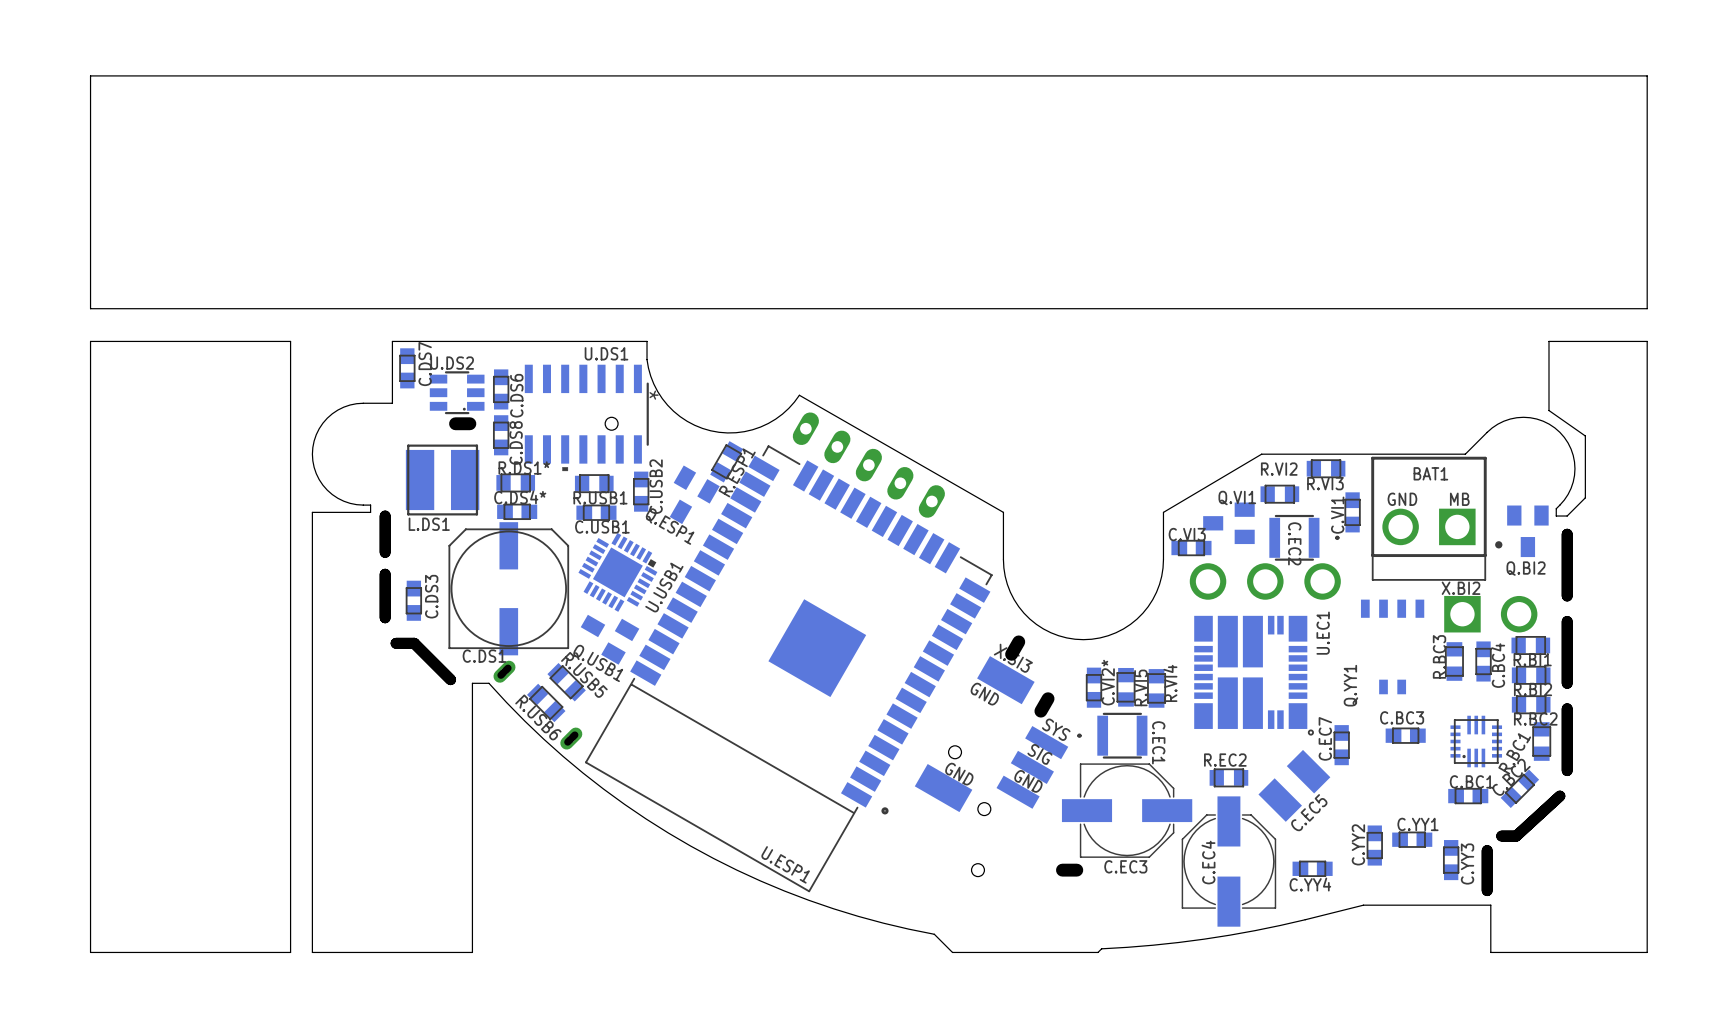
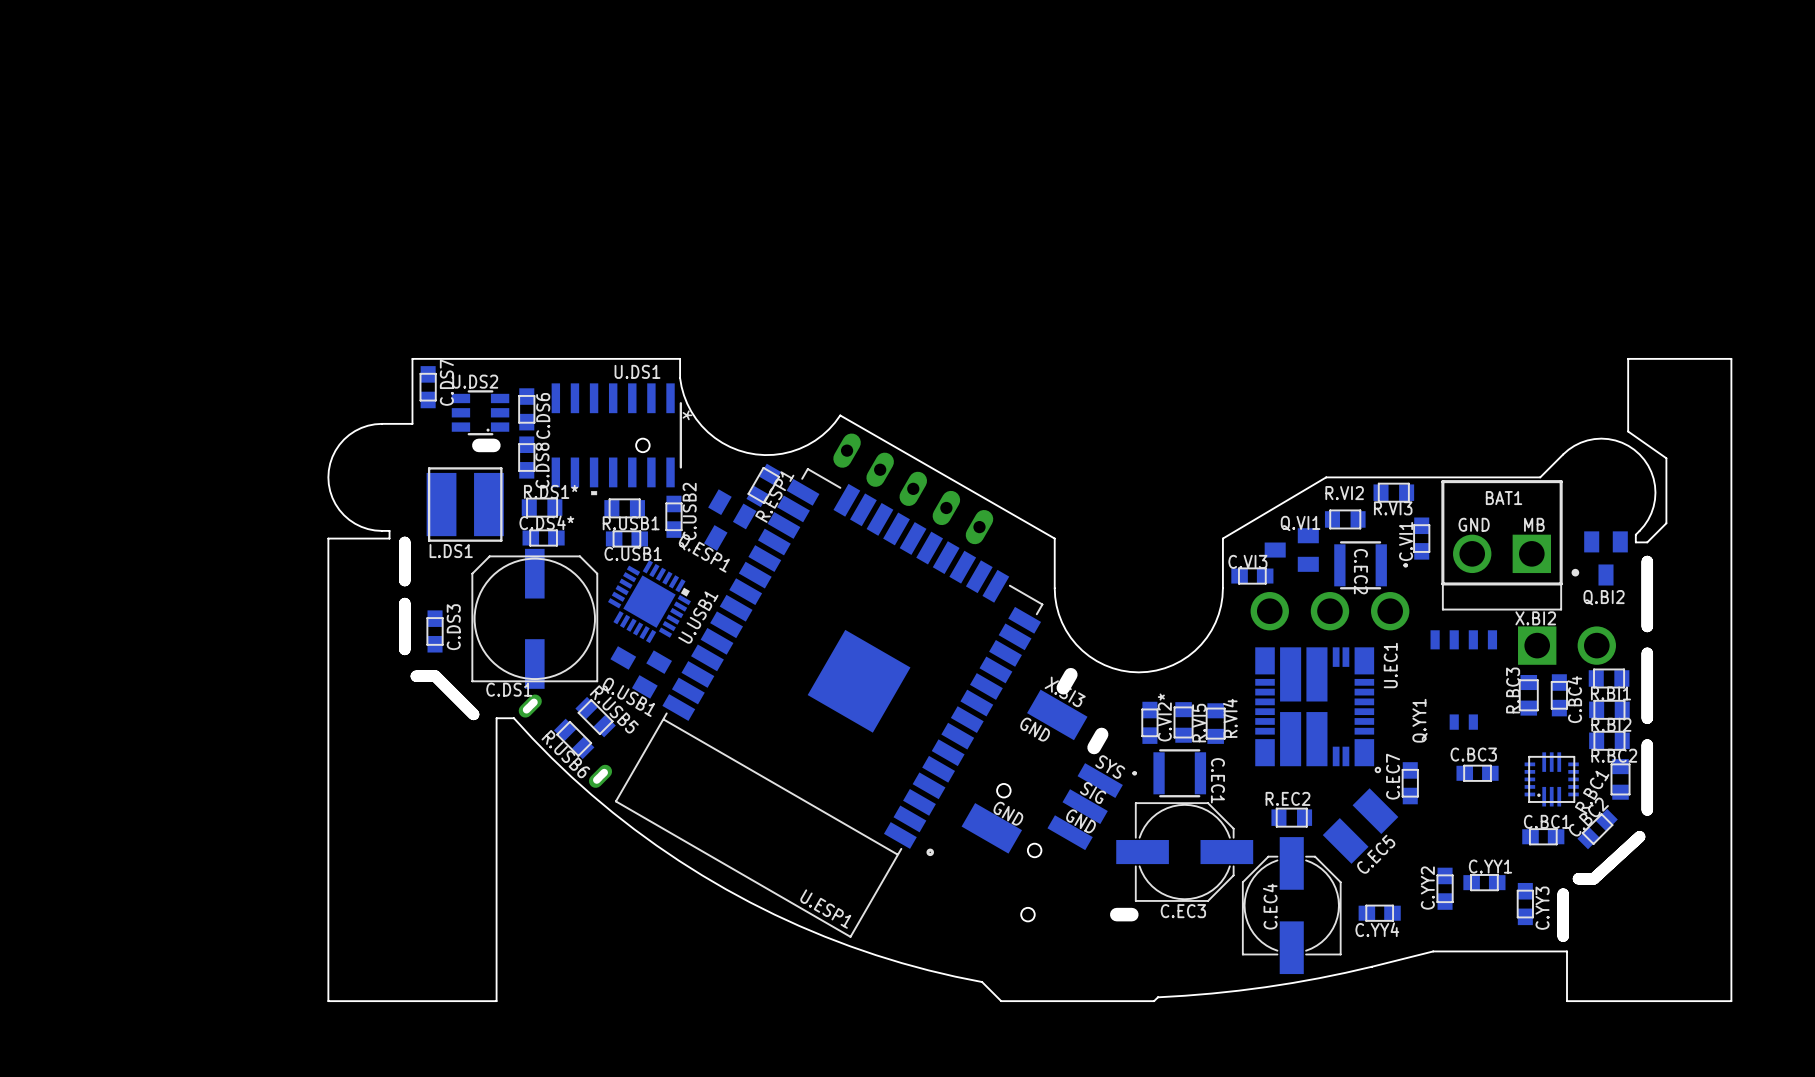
board edge: (1647, 75) (1647, 308) (90, 308) (90, 75) (1647, 75) -> none
board edge: (290, 341) (90, 341) (90, 952) (290, 952) (290, 341) -> none

